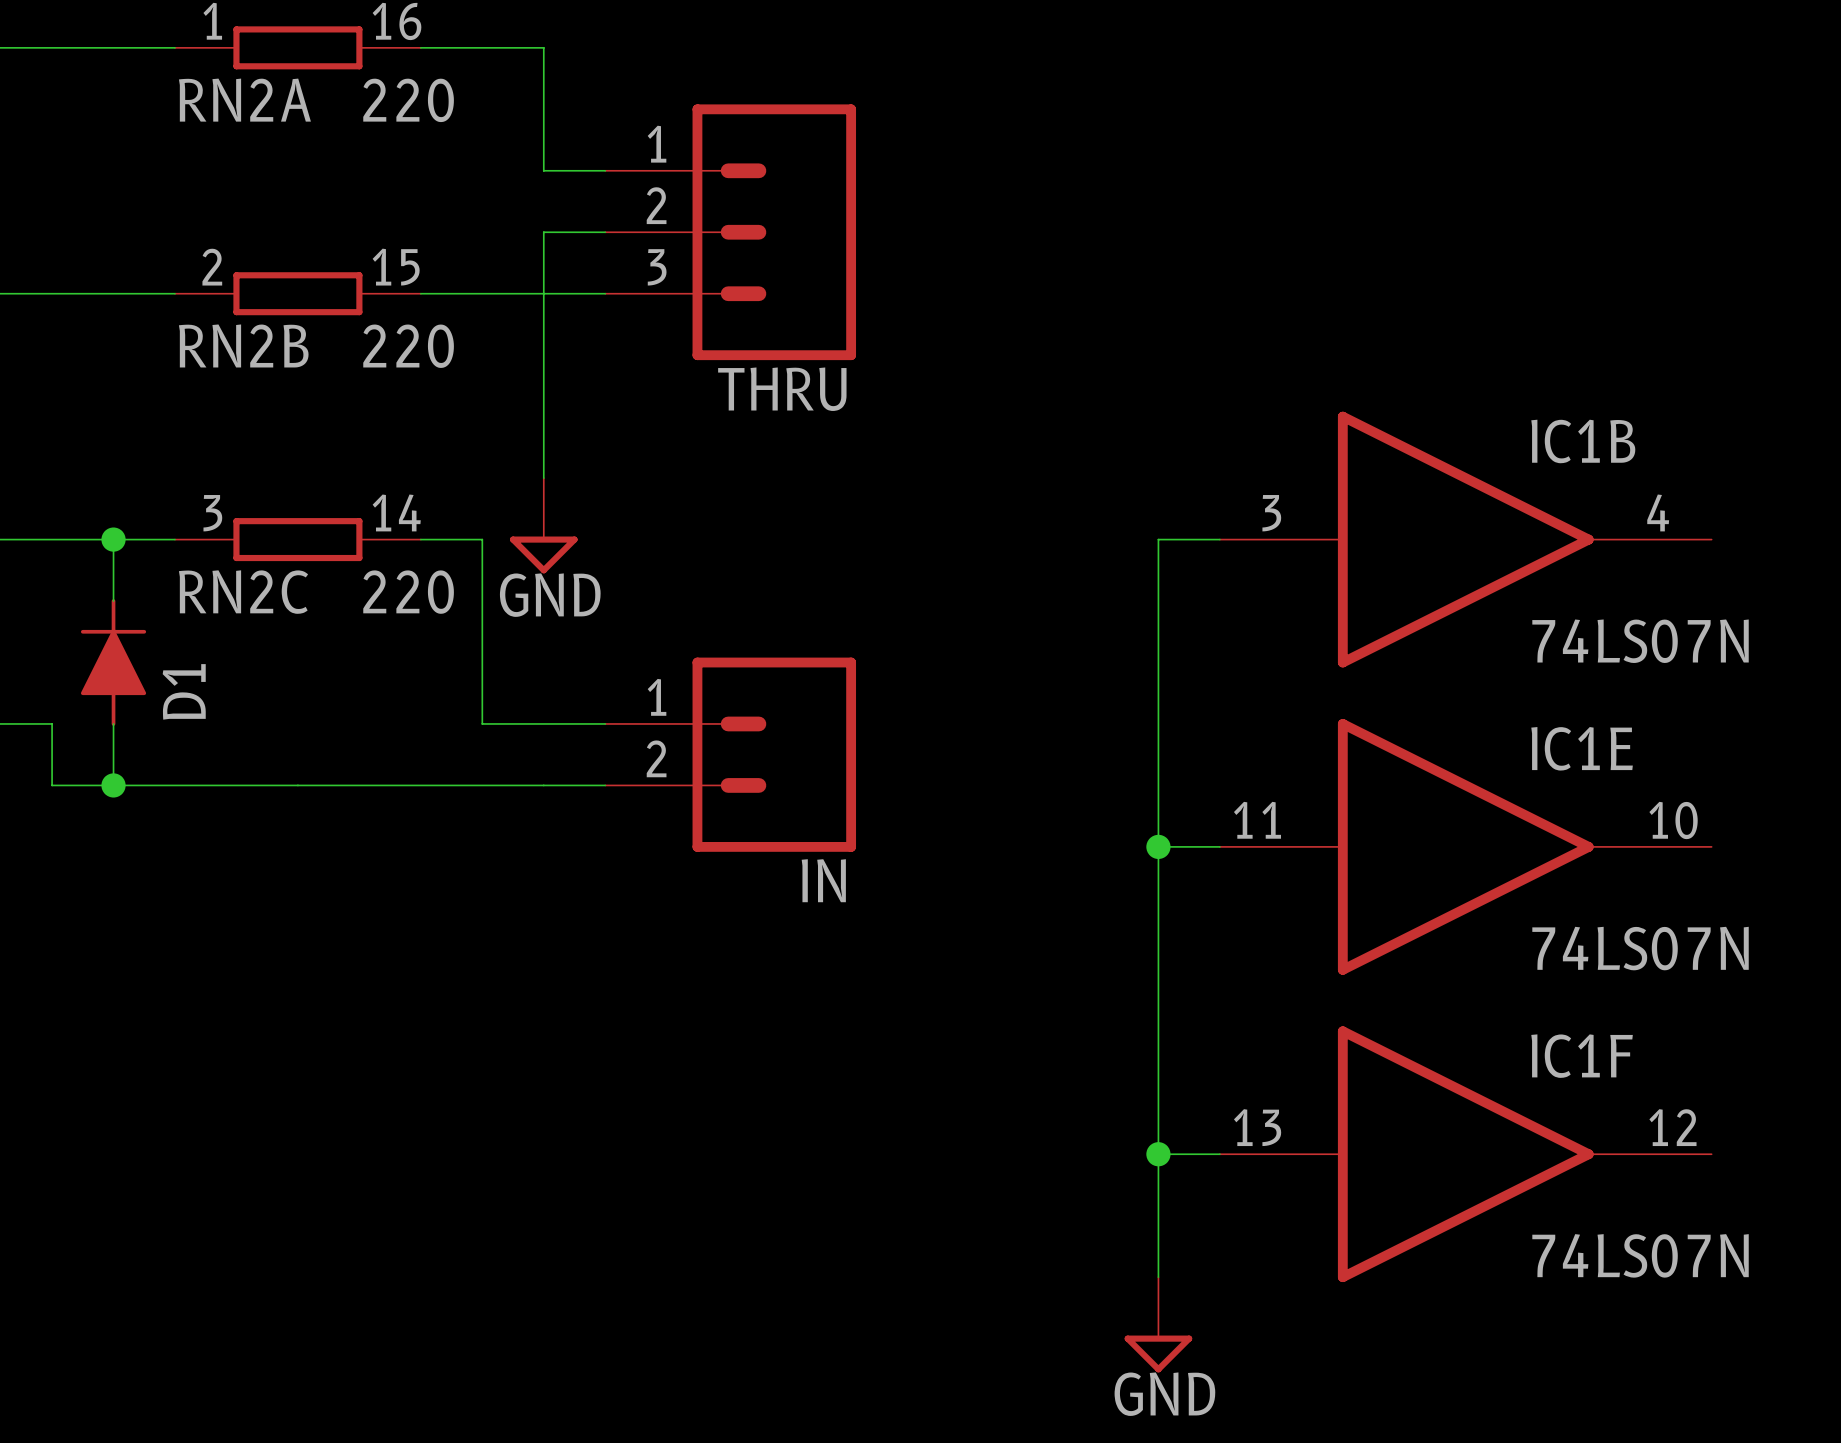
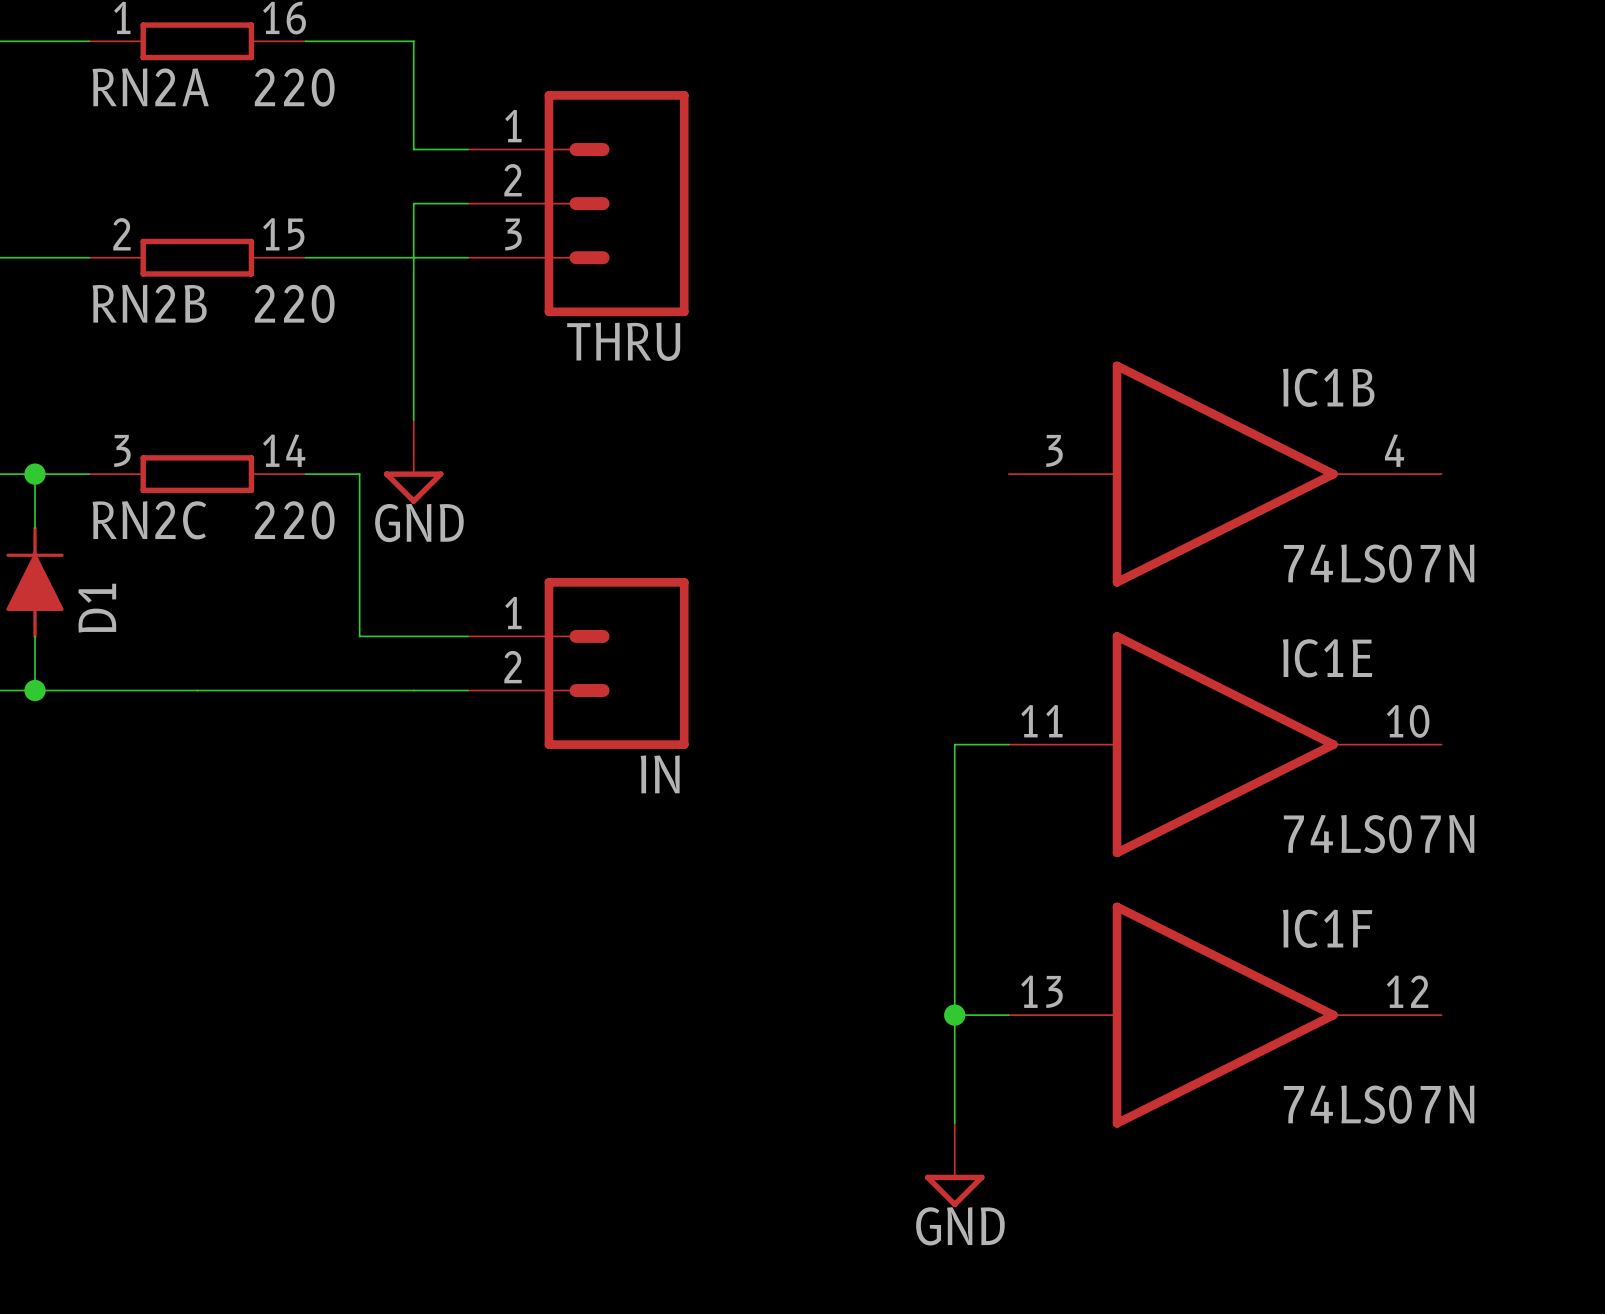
wire: (1219, 539) (1158, 539) (1158, 846) -> none
junction: (1158, 846) -> none

